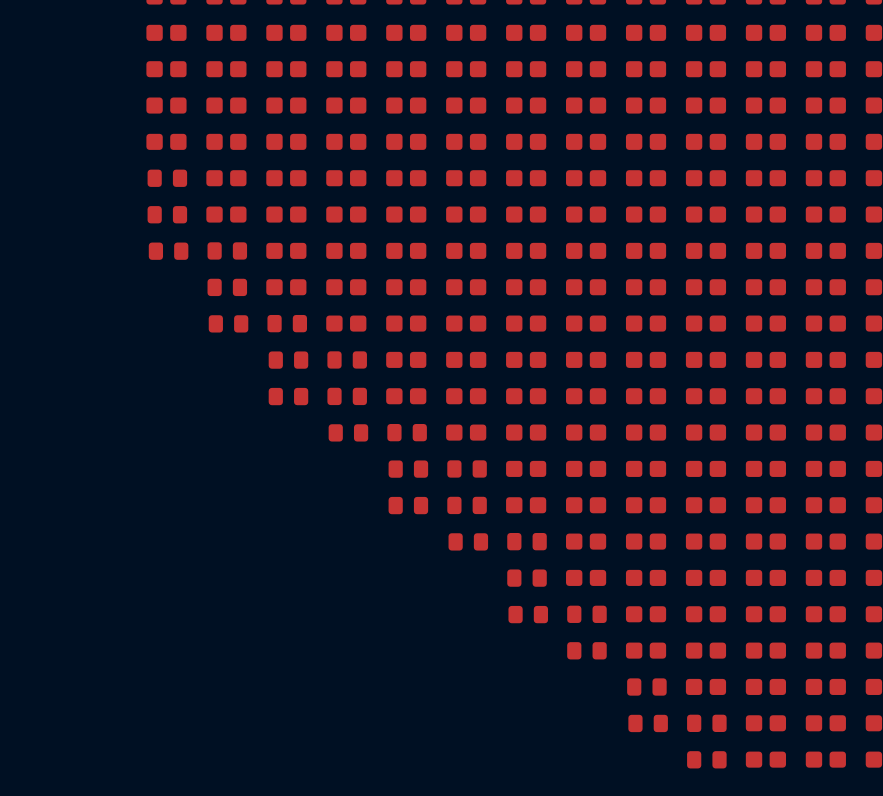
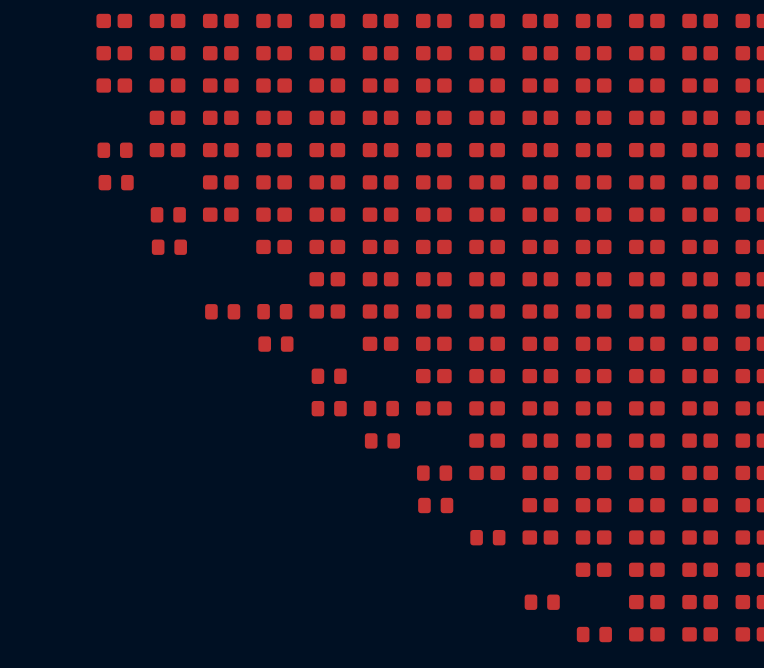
part: (167, 178) -> none
part: (227, 250) -> none
part: (287, 323) -> none
part: (347, 359) -> none
part: (288, 360) -> none
part: (407, 432) -> none
part: (467, 468) -> none
part: (527, 541) -> none
part: (586, 614) -> none
part: (646, 687) -> none
part: (706, 723) -> none

